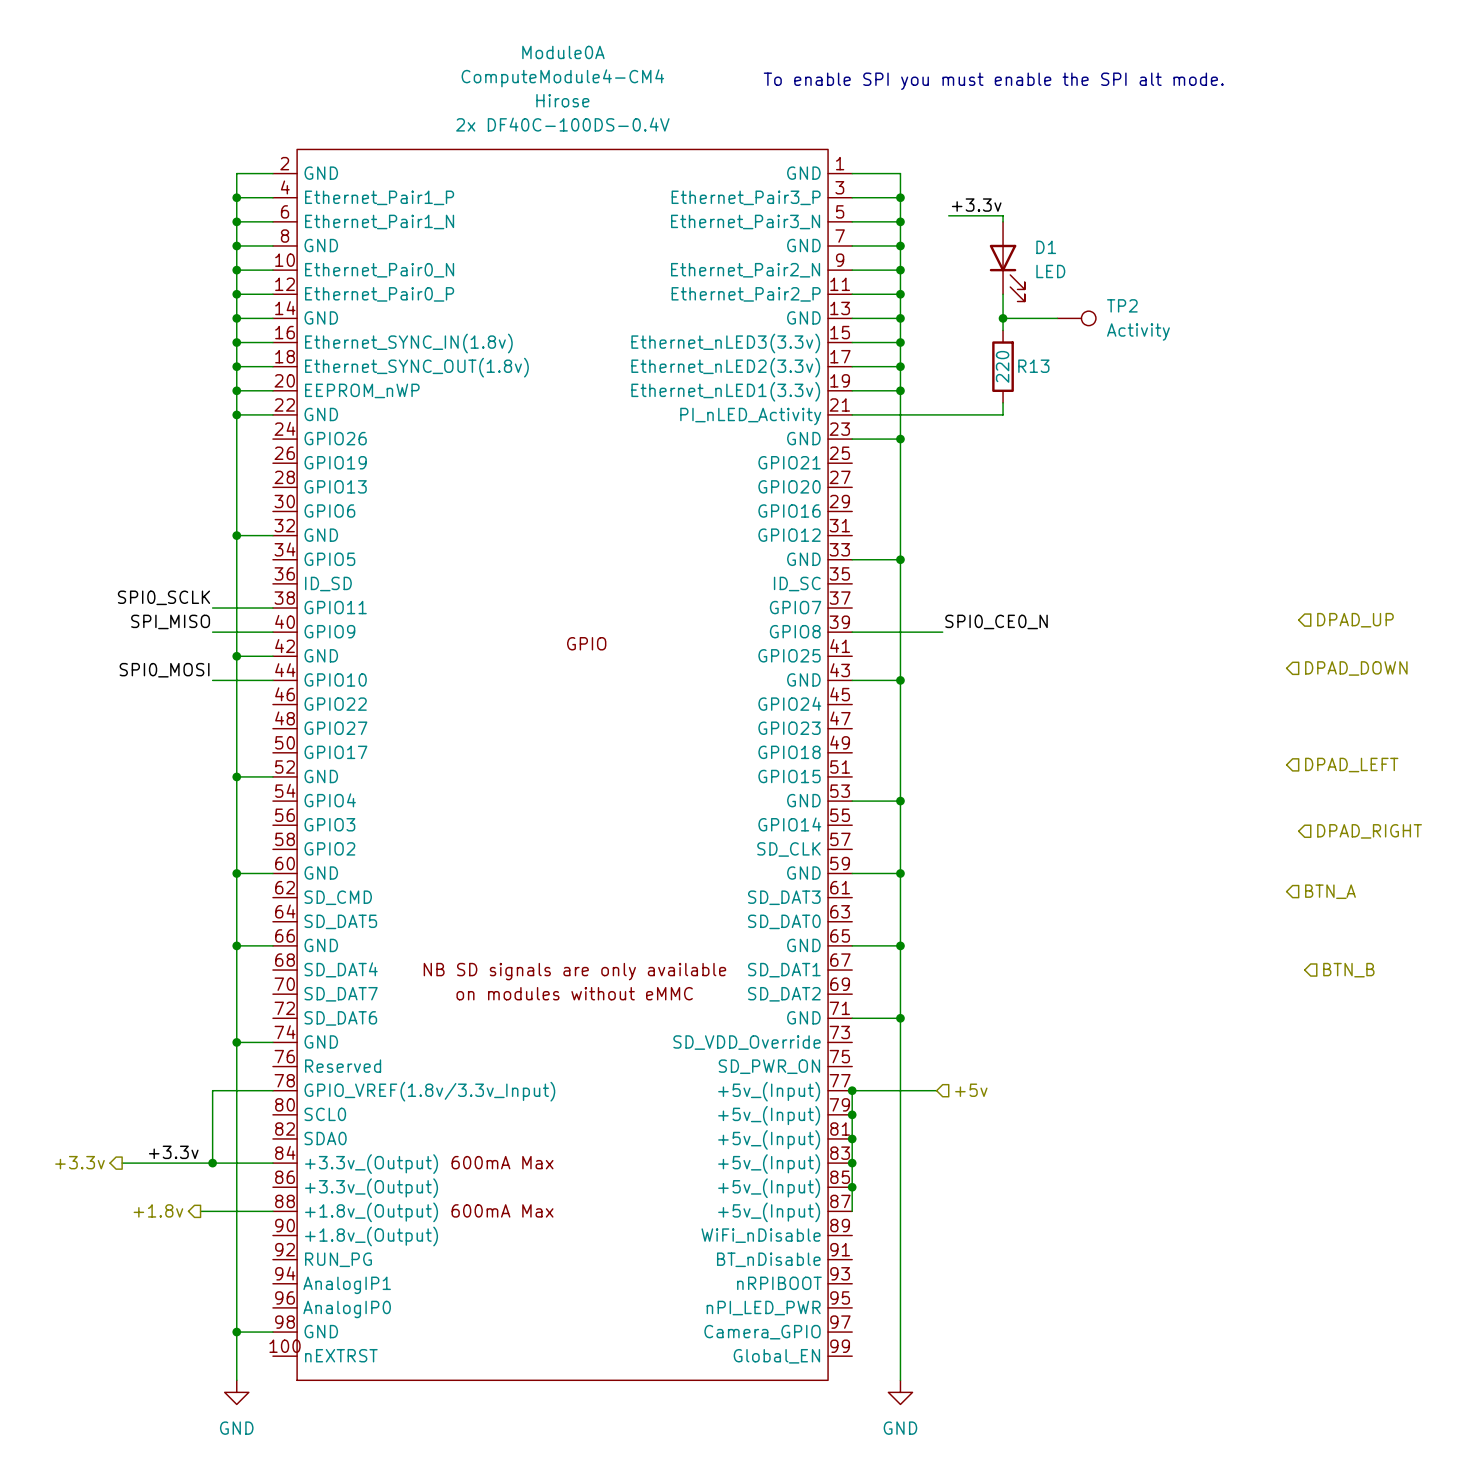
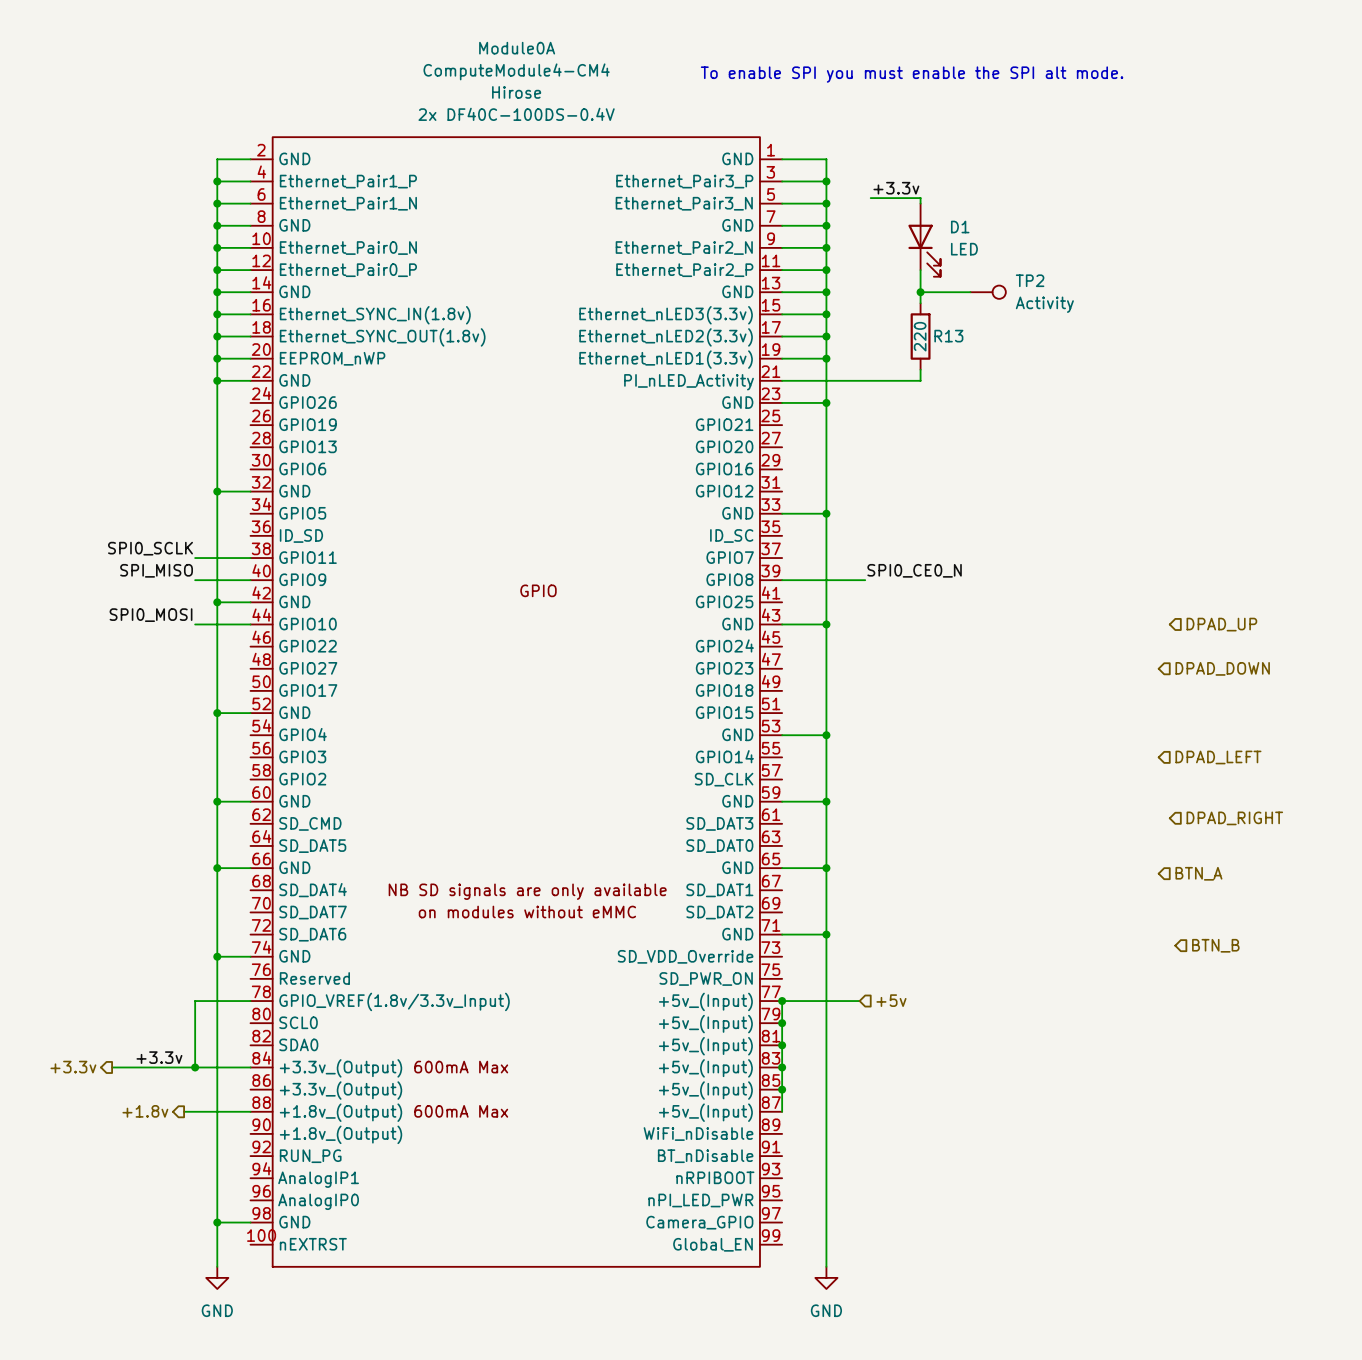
hierarchical label position: DPAD_UP (1355, 620) -> DPAD_UP (1221, 624)
hierarchical label position: DPAD_DOWN (1356, 668) -> DPAD_DOWN (1222, 668)
hierarchical label position: DPAD_LEFT (1351, 765) -> DPAD_LEFT (1218, 757)
hierarchical label position: DPAD_RIGHT (1369, 831) -> DPAD_RIGHT (1234, 818)
hierarchical label position: BTN_A (1330, 891) -> BTN_A (1198, 873)
hierarchical label position: BTN_B (1348, 970) -> BTN_B (1215, 945)

